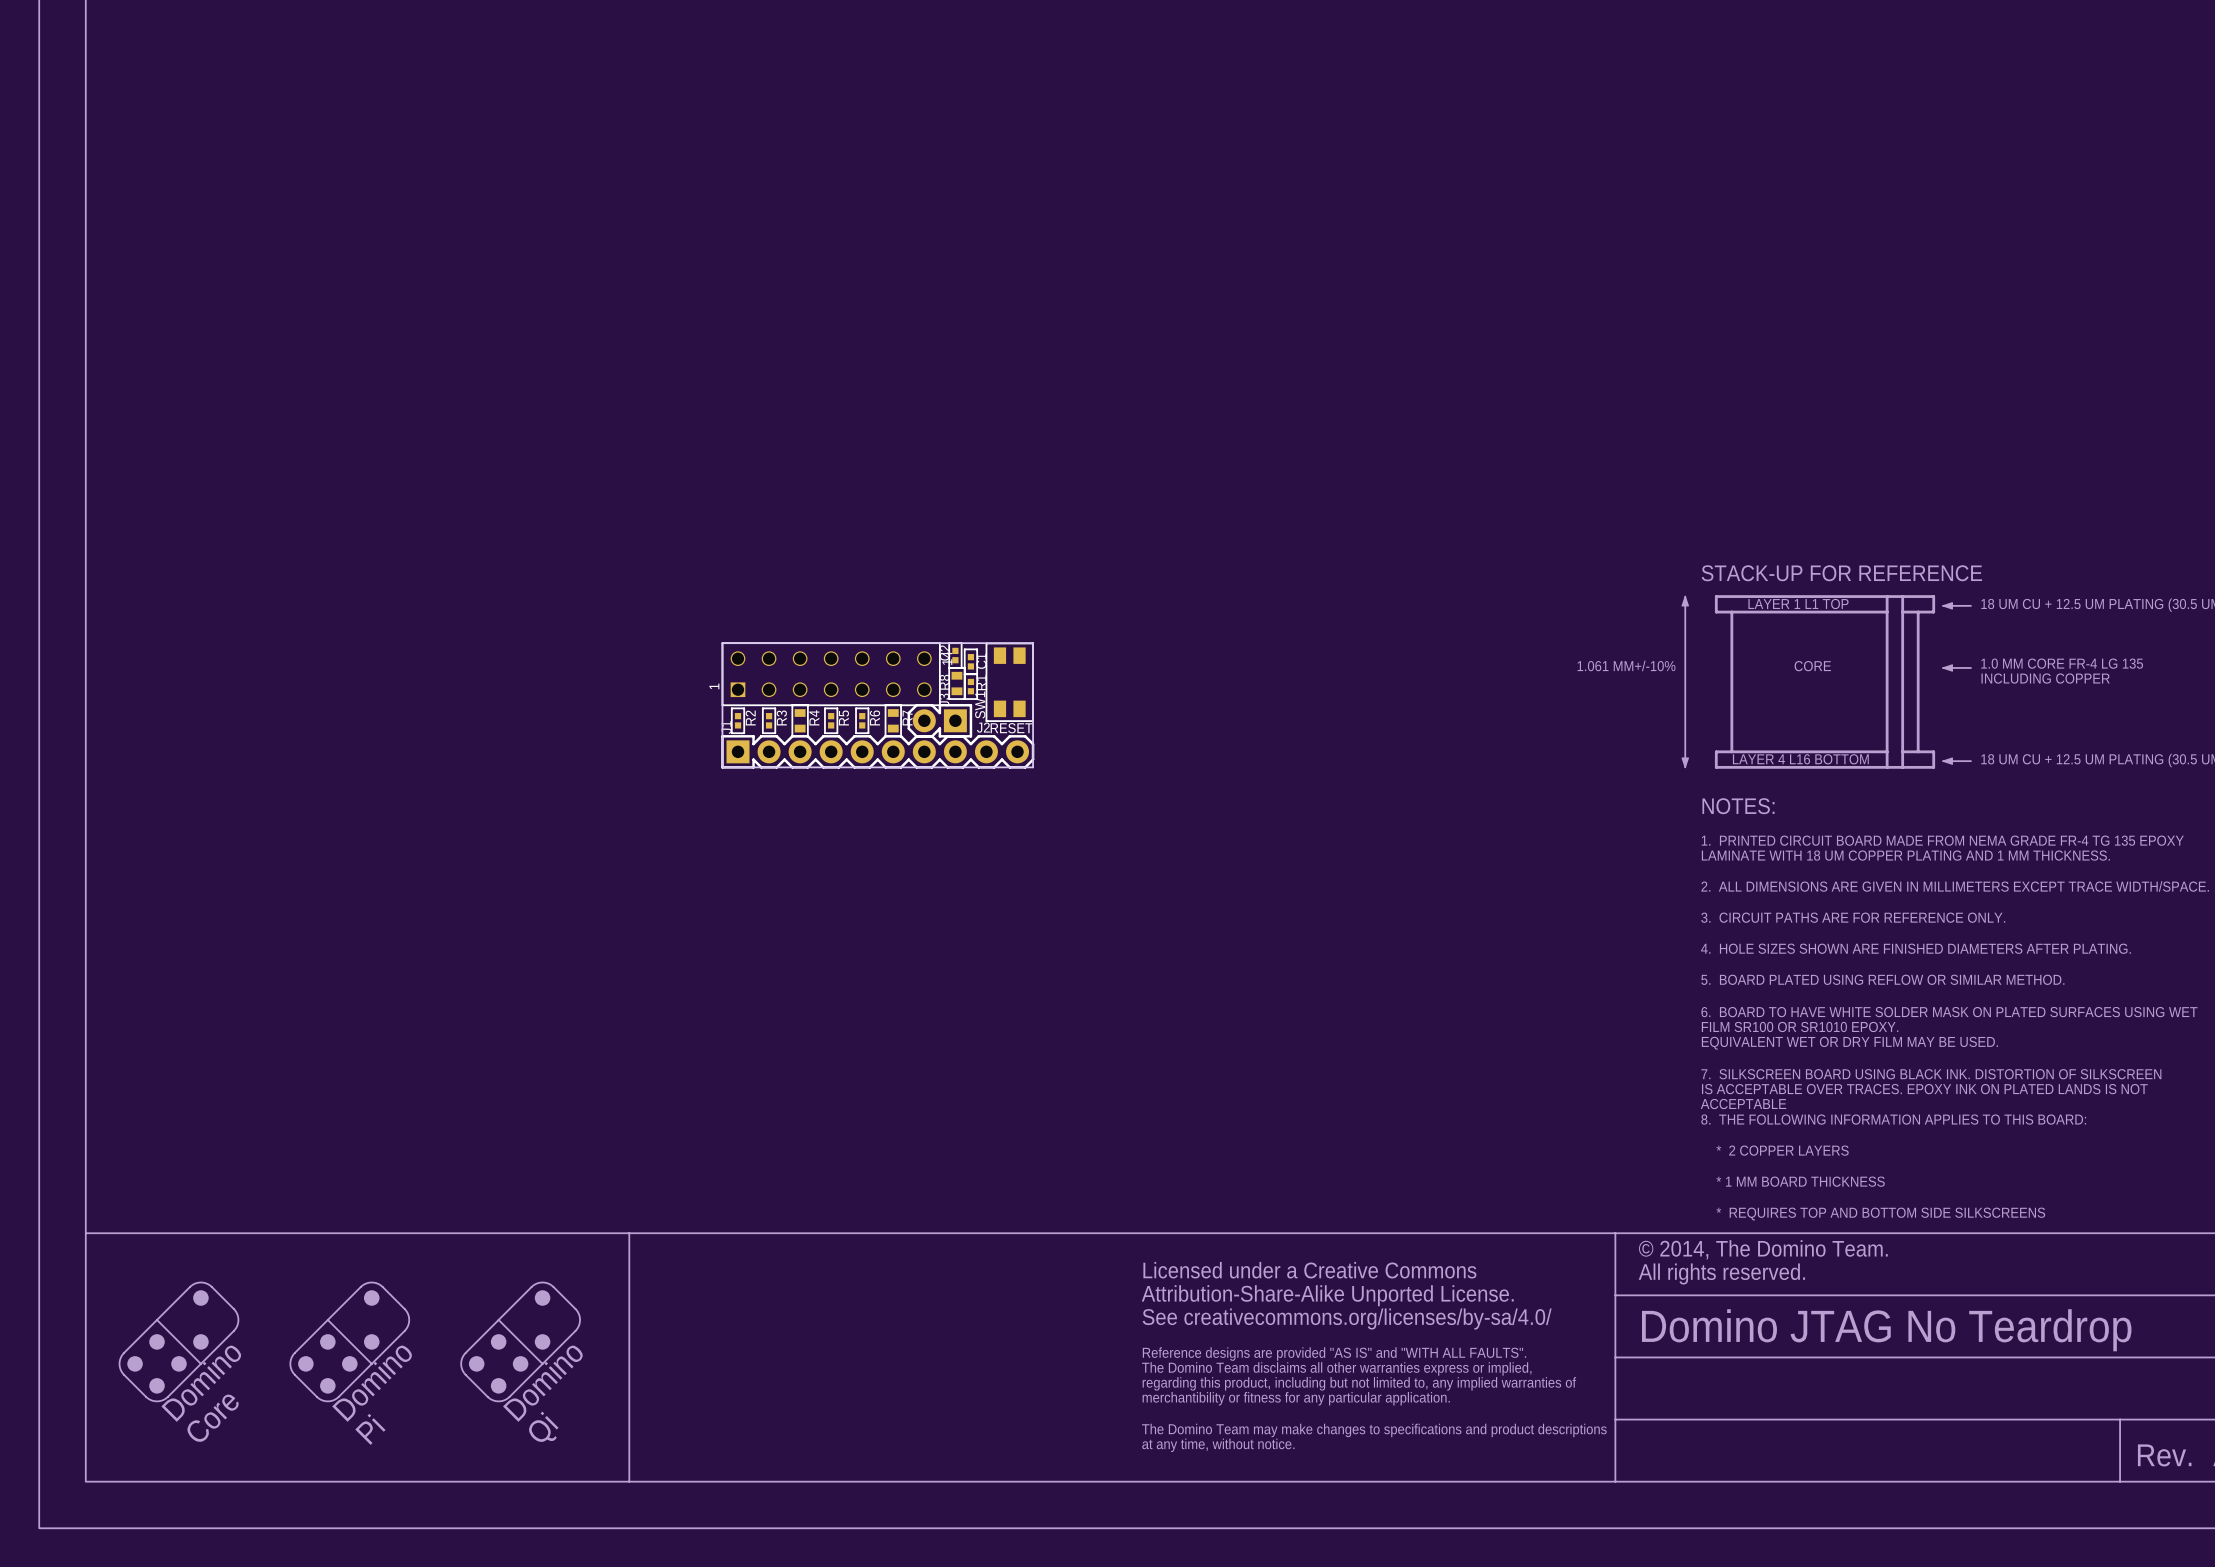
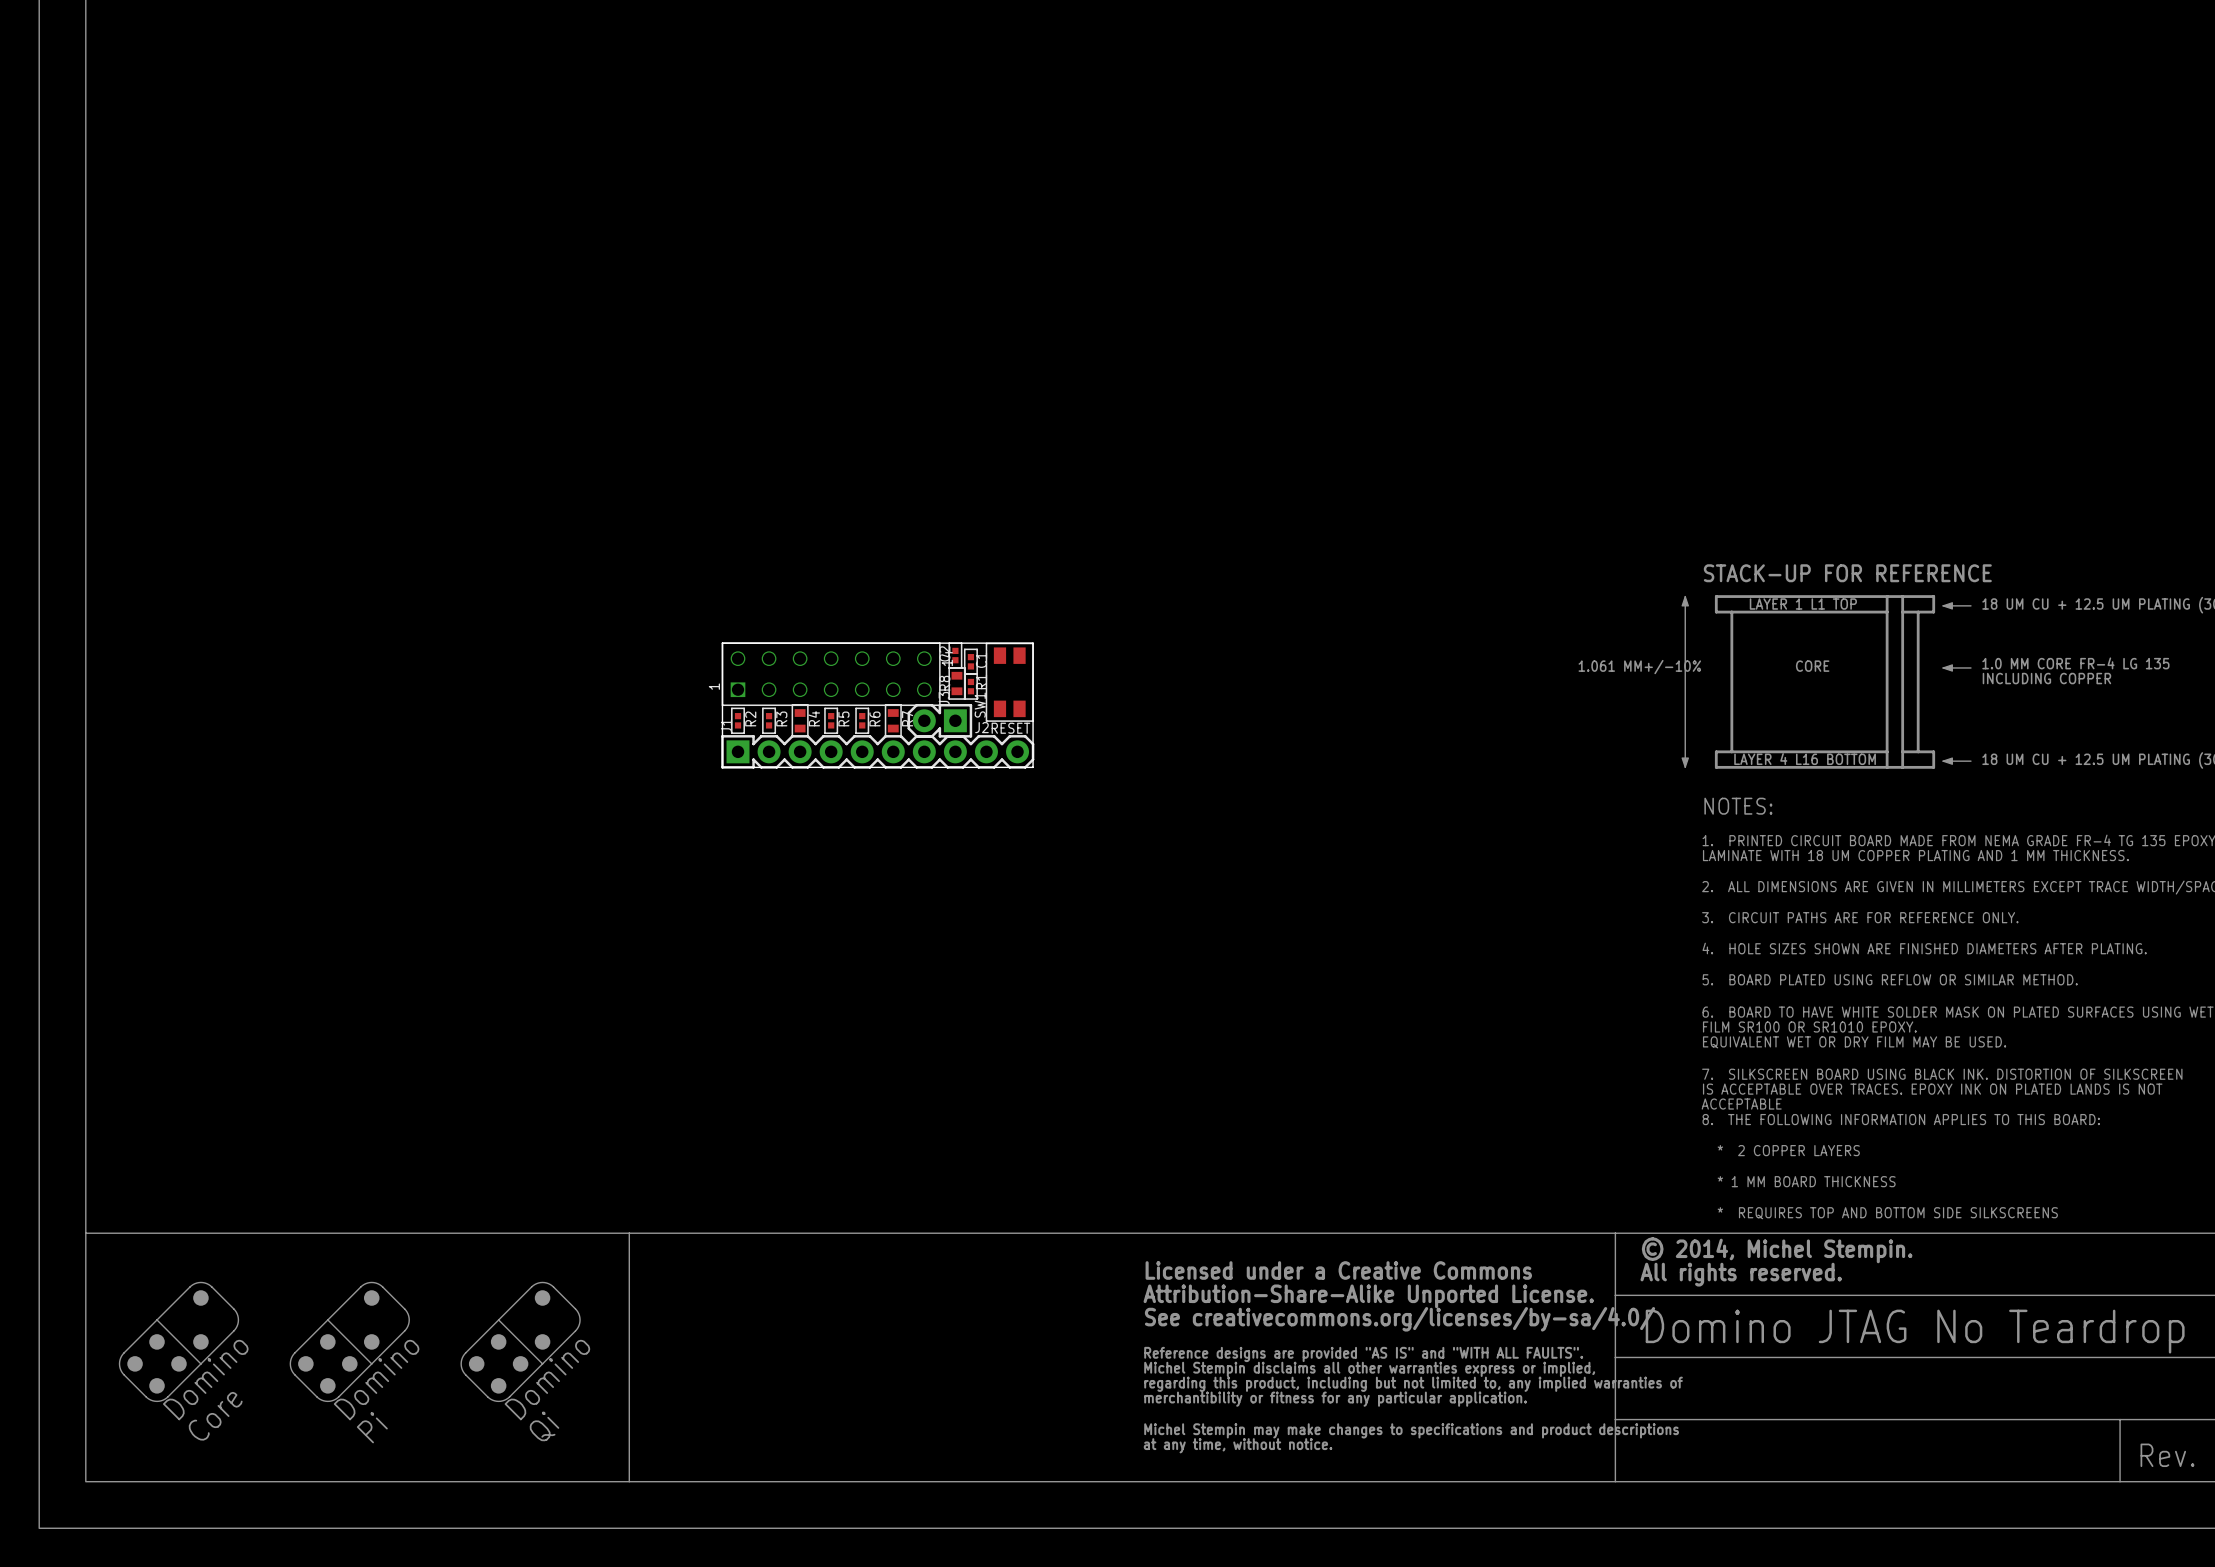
text: © 2014, The Domino Team. (1763, 1249) -> © 2014, Michel Stempin. (1777, 1250)
text: The Domino Team disclaims all other warranties express or implied, (1336, 1368) -> Michel Stempin disclaims all other warranties express or implied, (1369, 1369)
text: The Domino Team may make changes to specifications and product descriptions (1374, 1430) -> Michel Stempin may make changes to specifications and product descriptions (1411, 1430)

